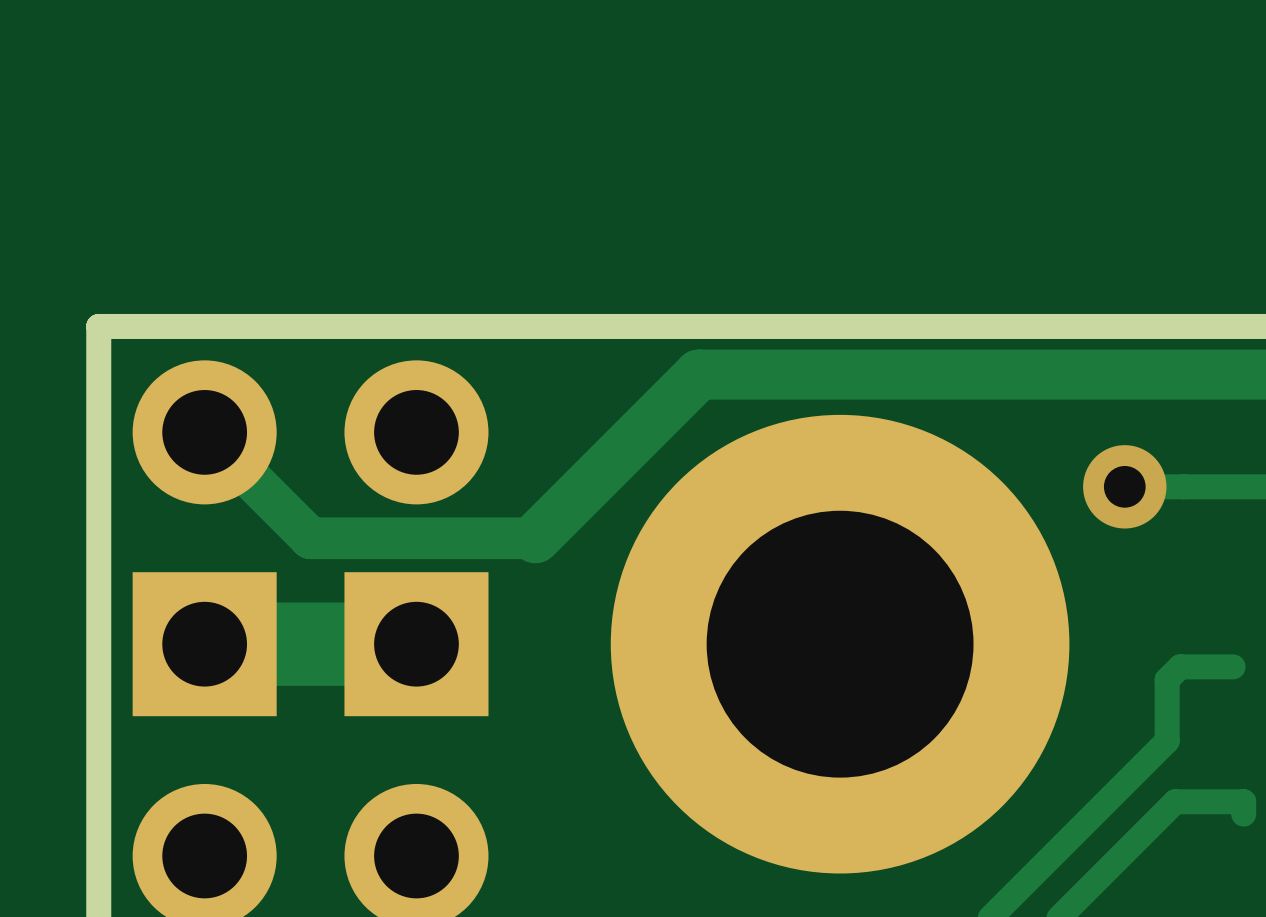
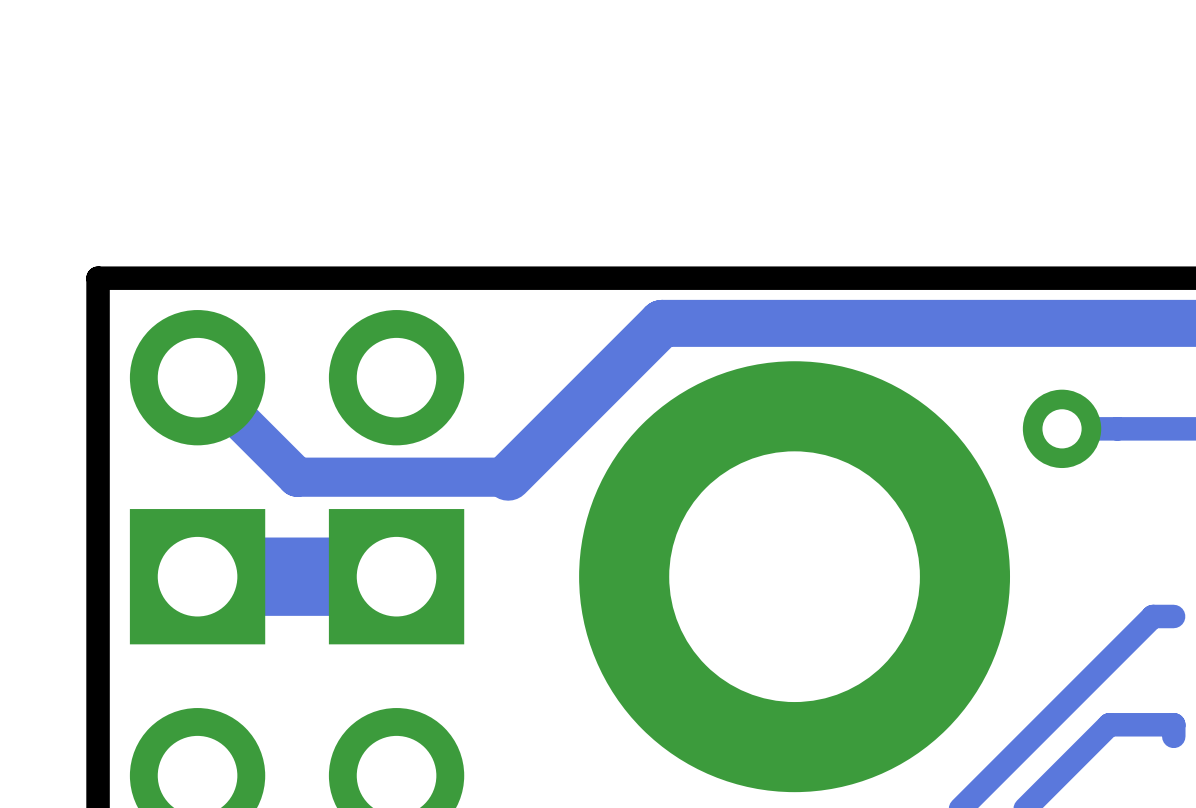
track: (1233, 666) (1180, 666) (1167, 679) (1167, 741) -> (1173, 616) (1152, 616) (1101, 667)

